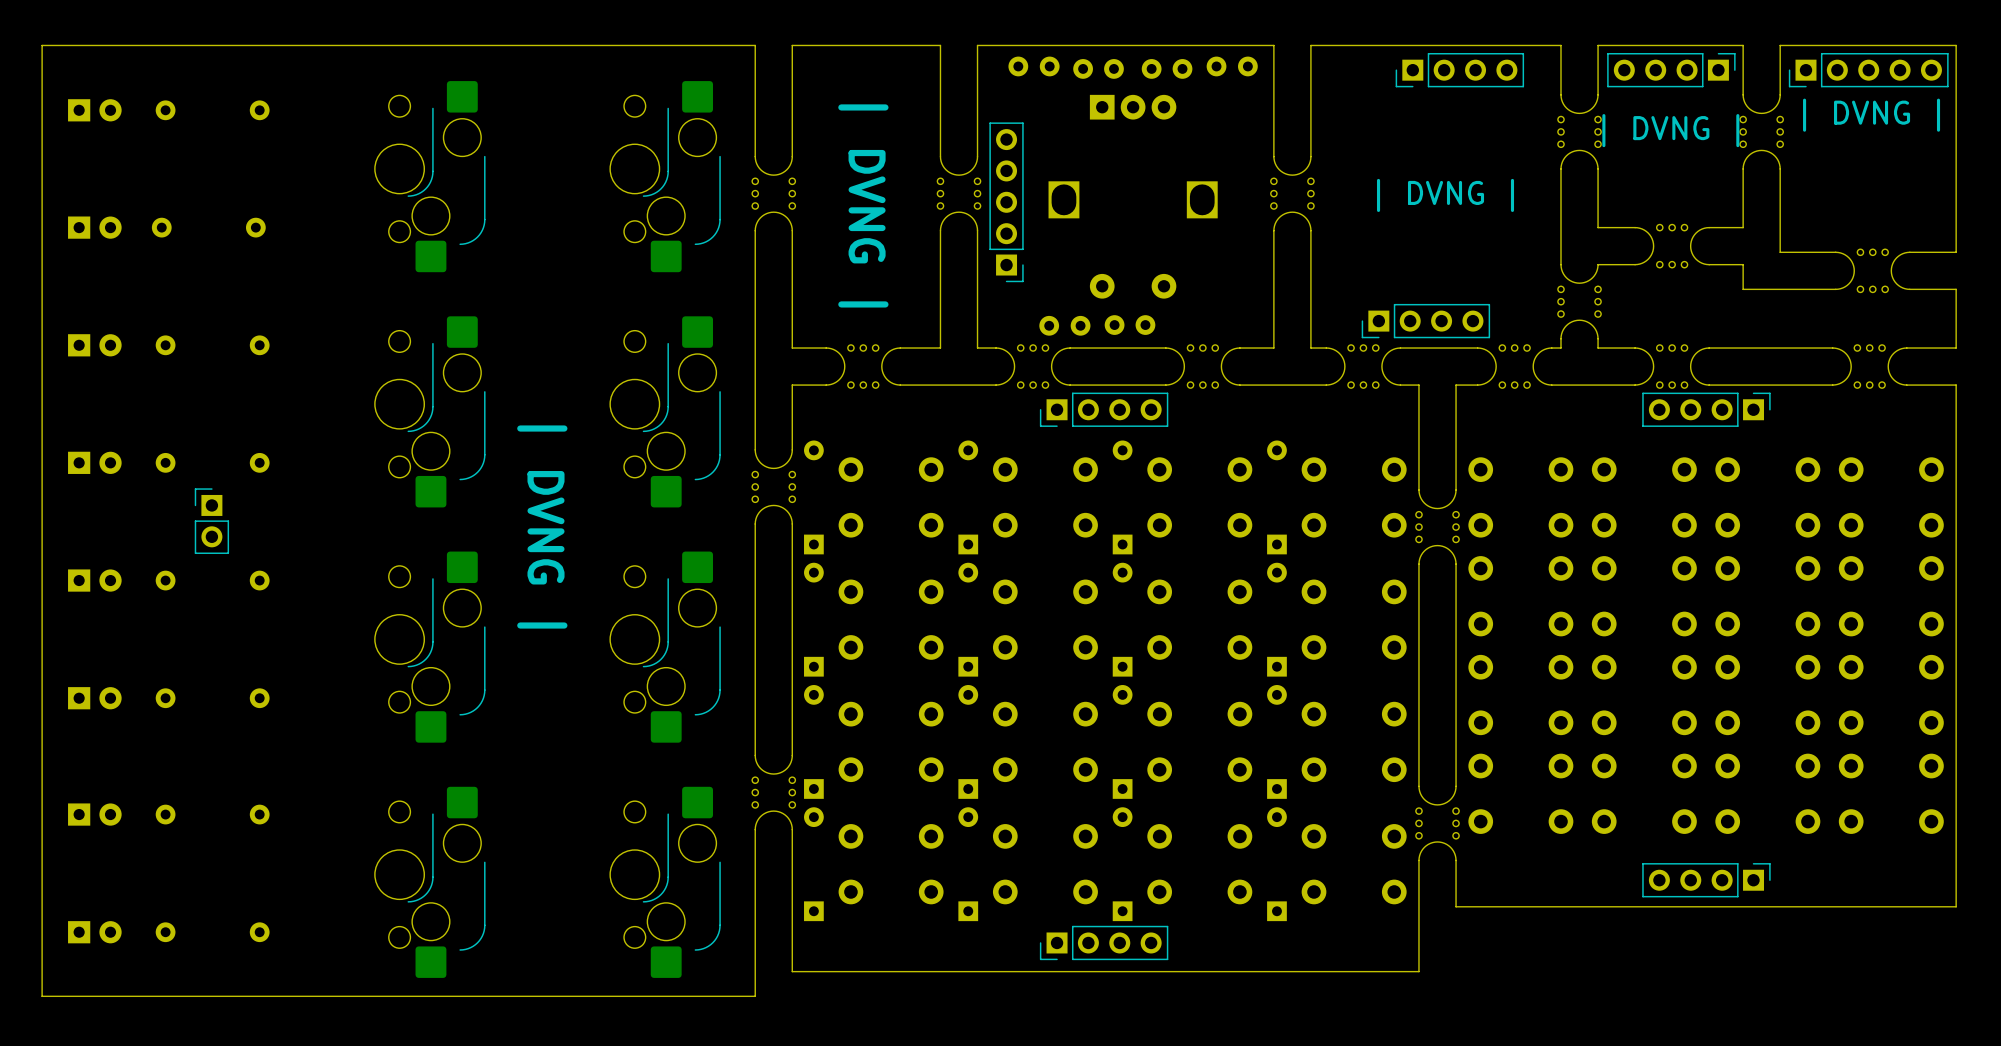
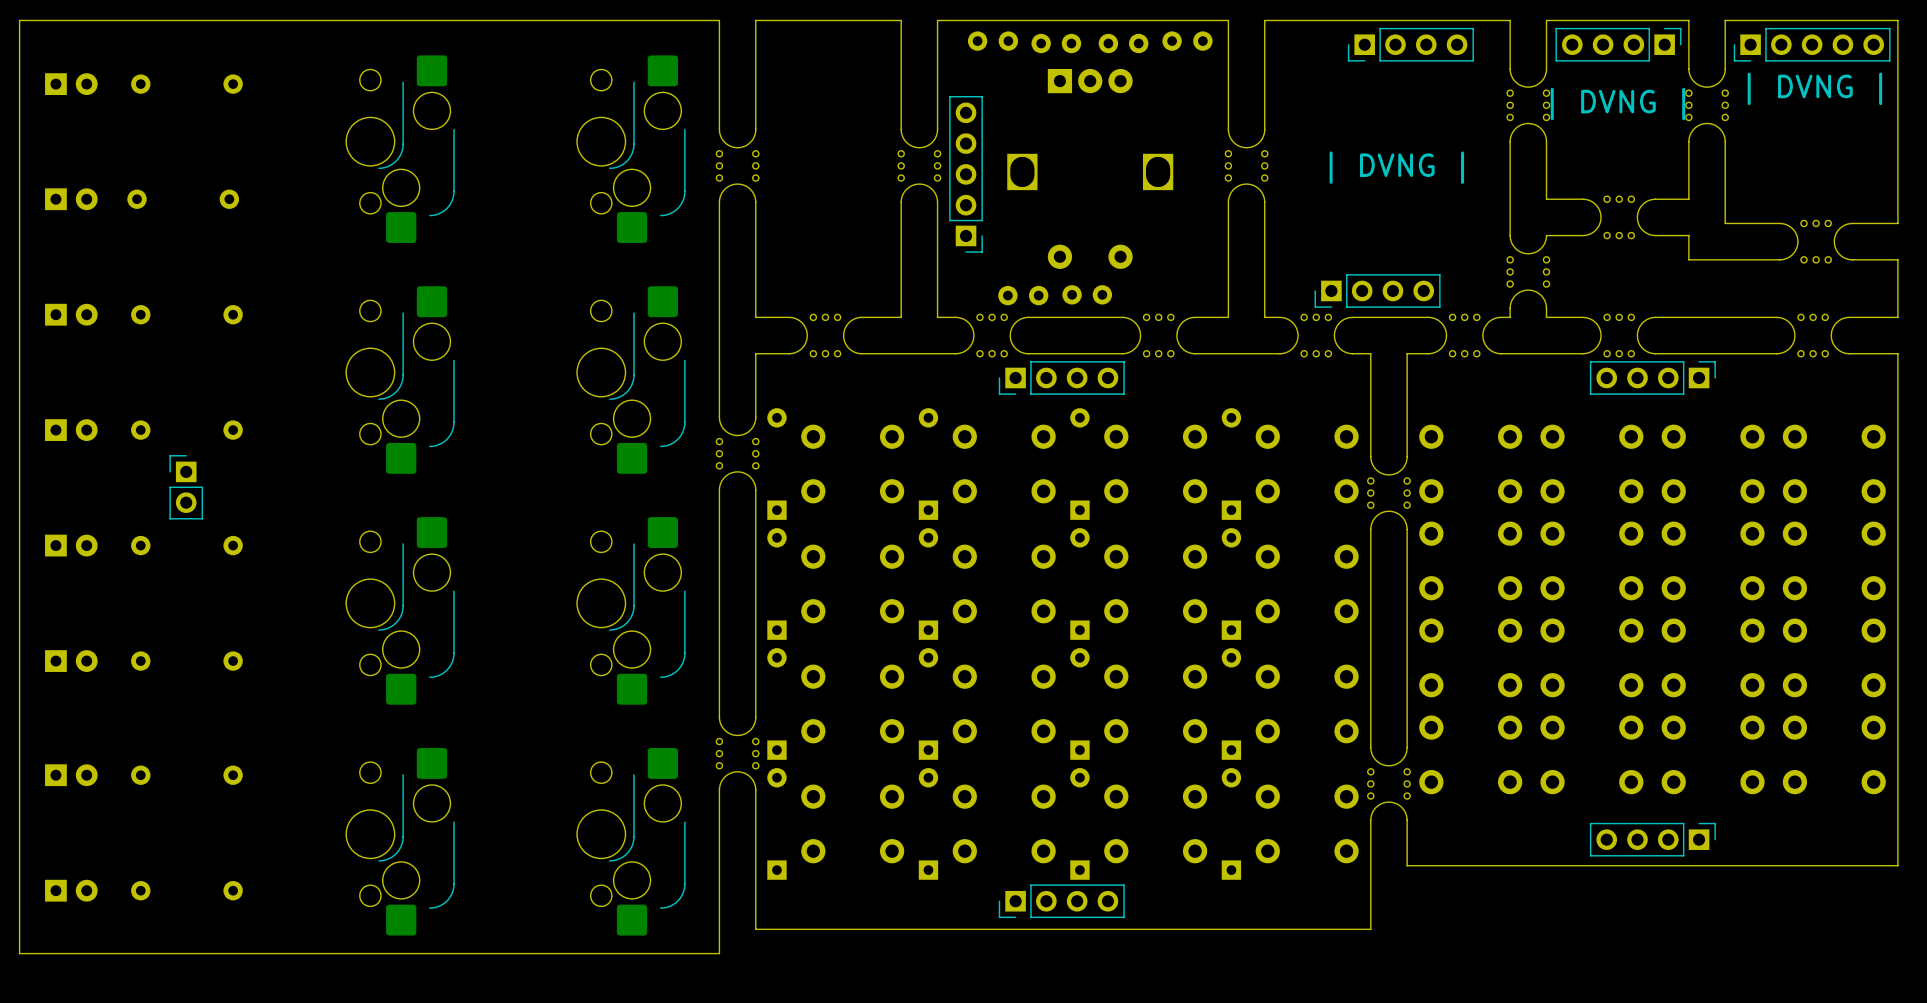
text: | DVNG | (863, 205) -> none
text: | DVNG | (542, 527) -> none

